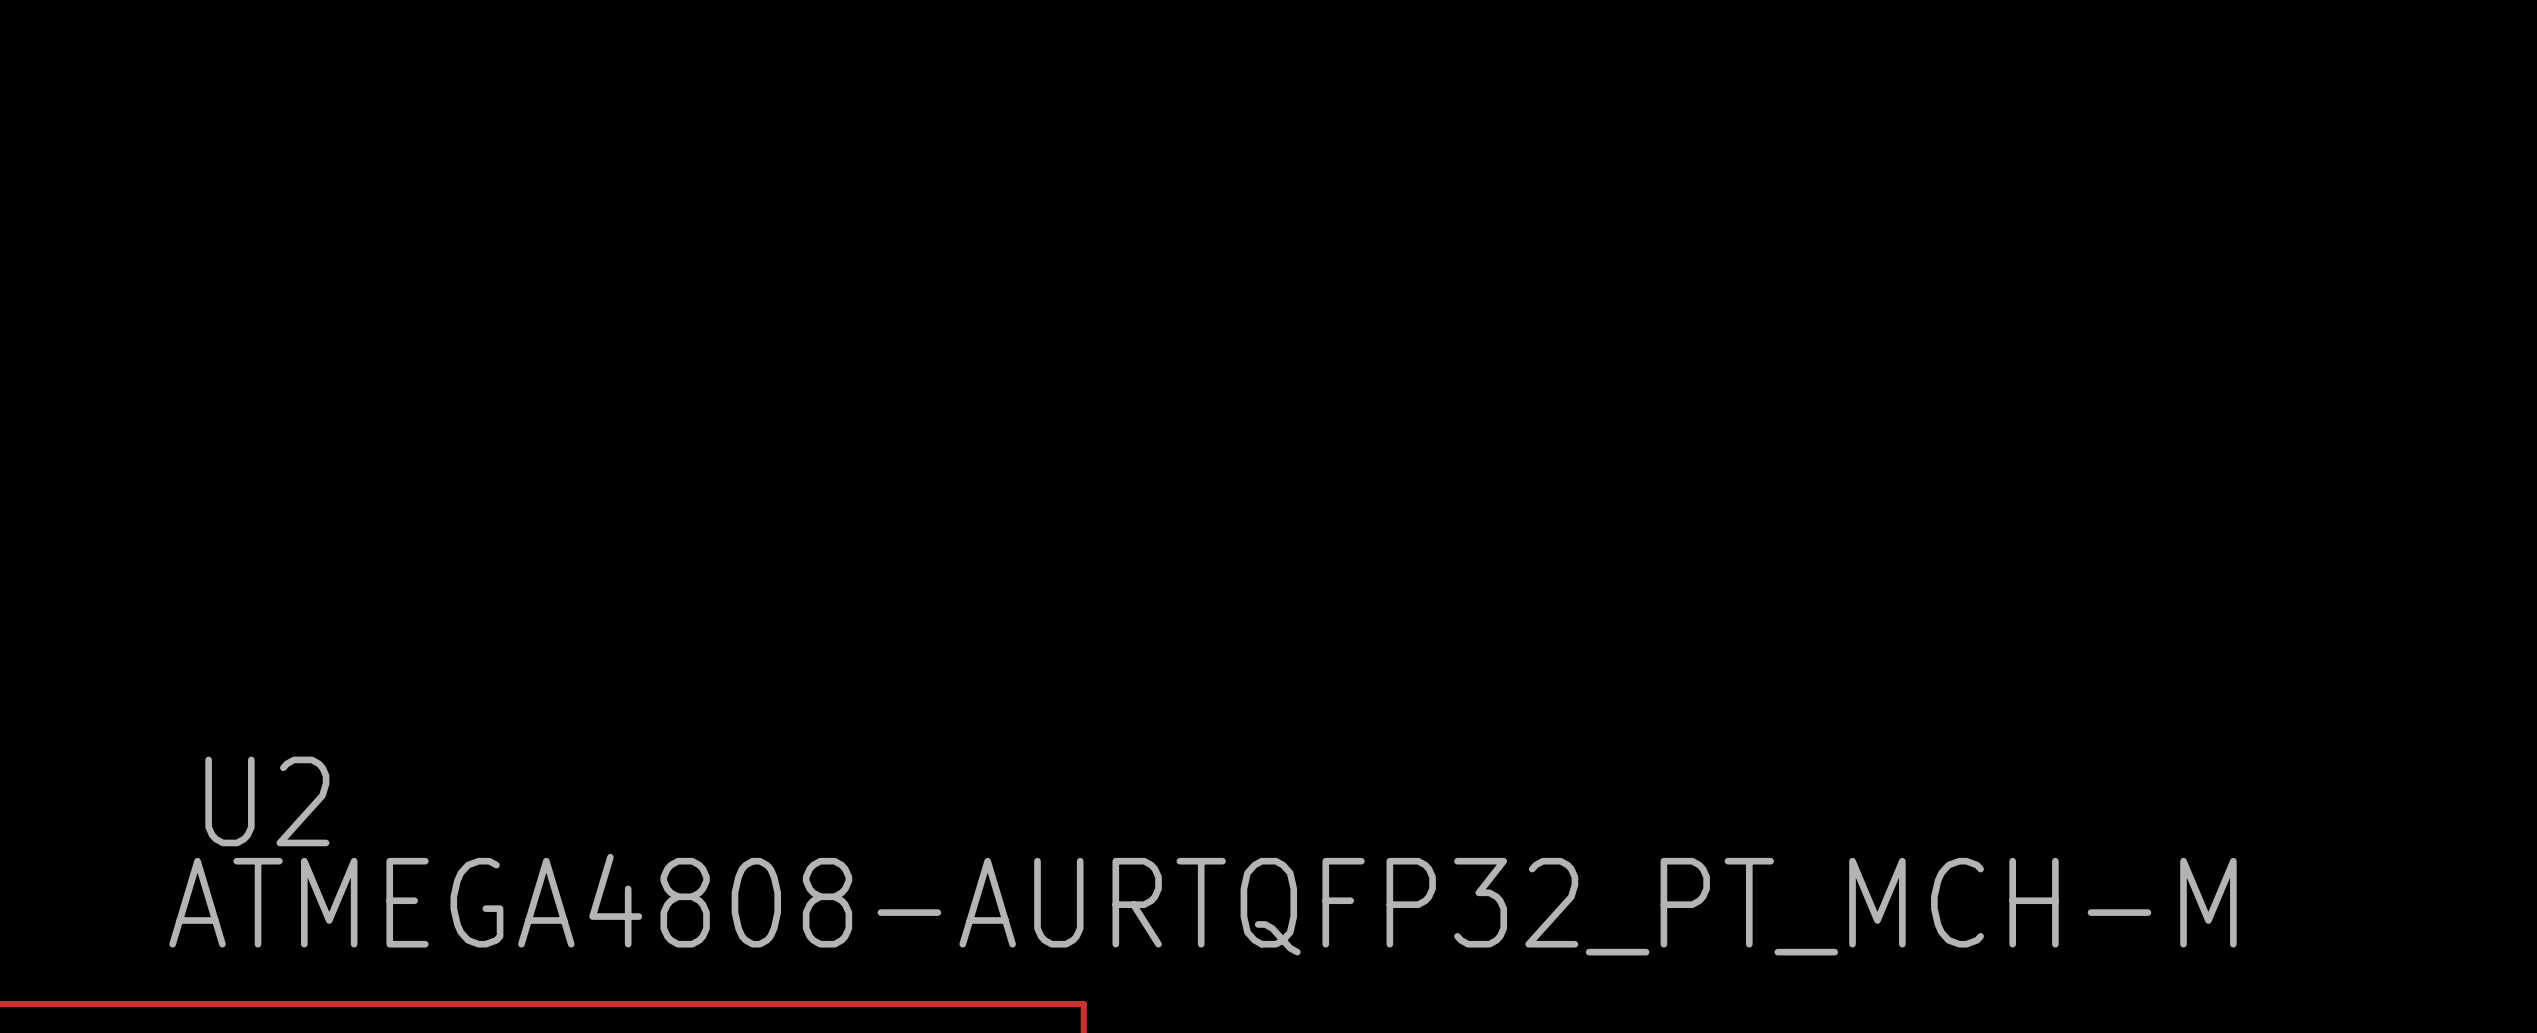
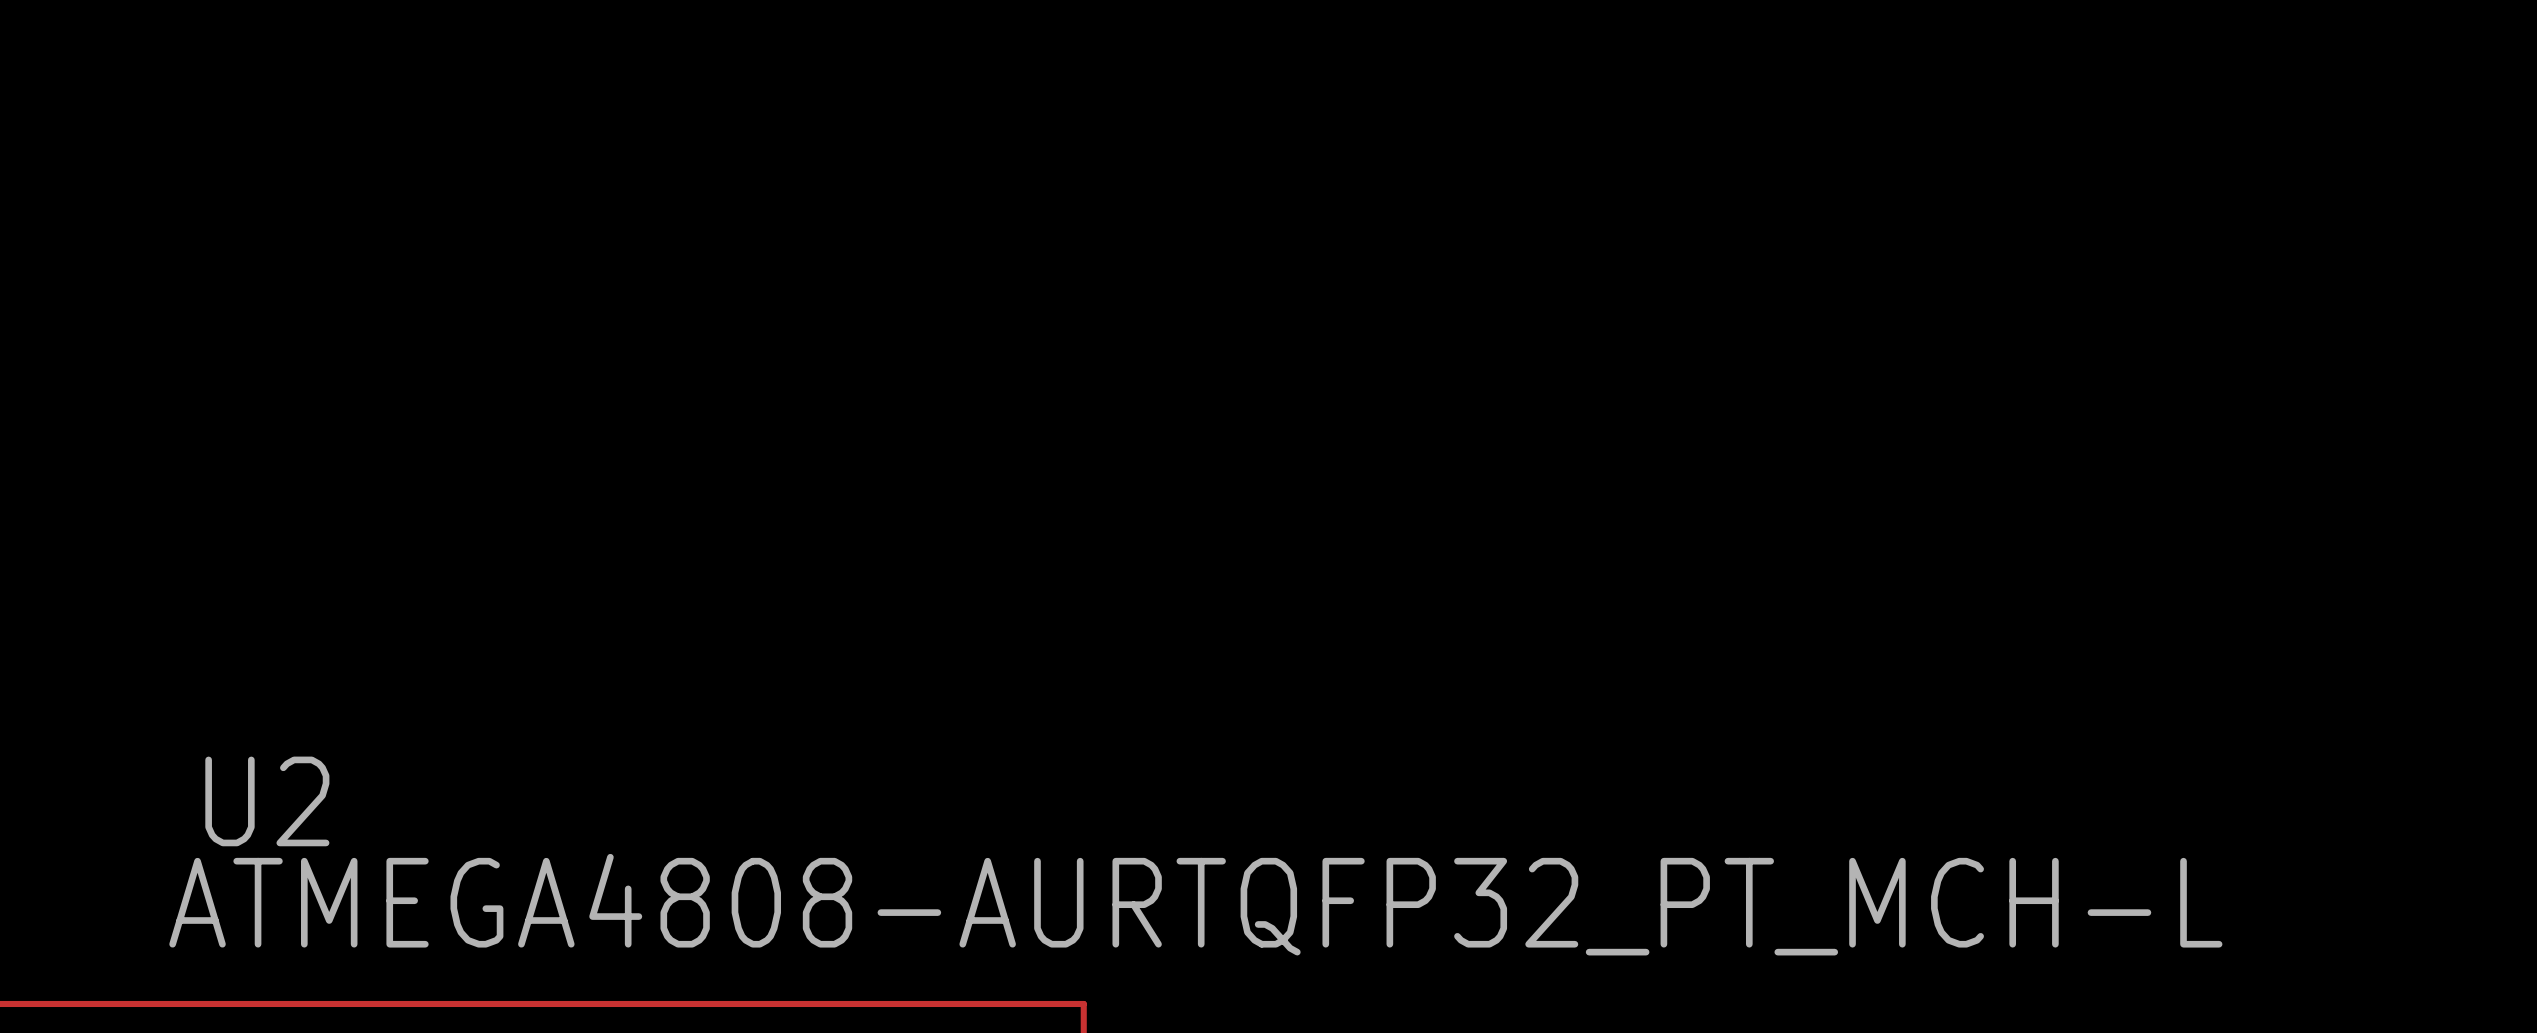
U2 value: ATMEGA4808-AURTQFP32_PT_MCH-M (1202, 904) -> ATMEGA4808-AURTQFP32_PT_MCH-L (1195, 904)

